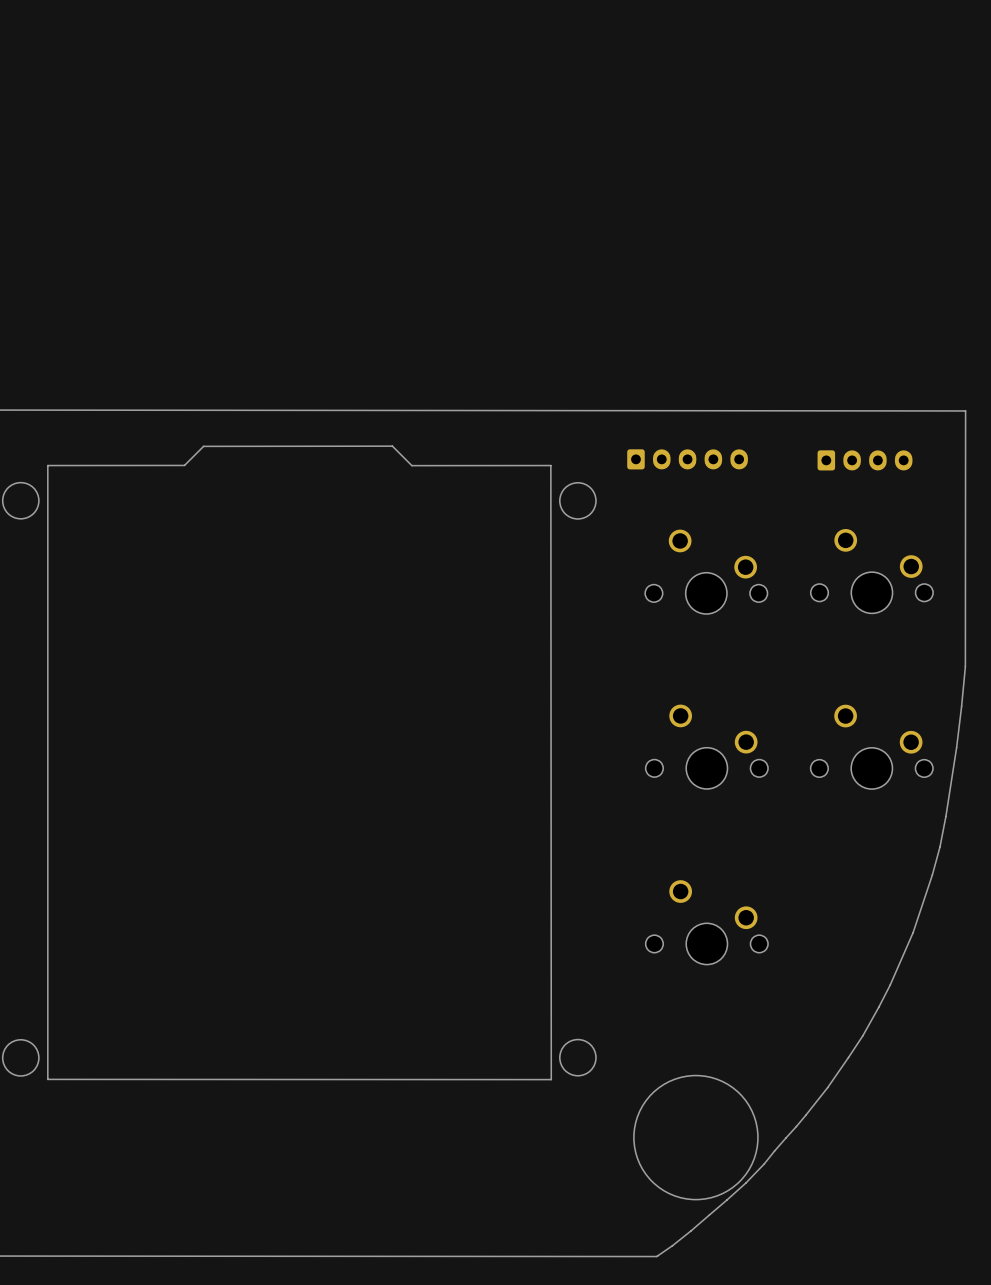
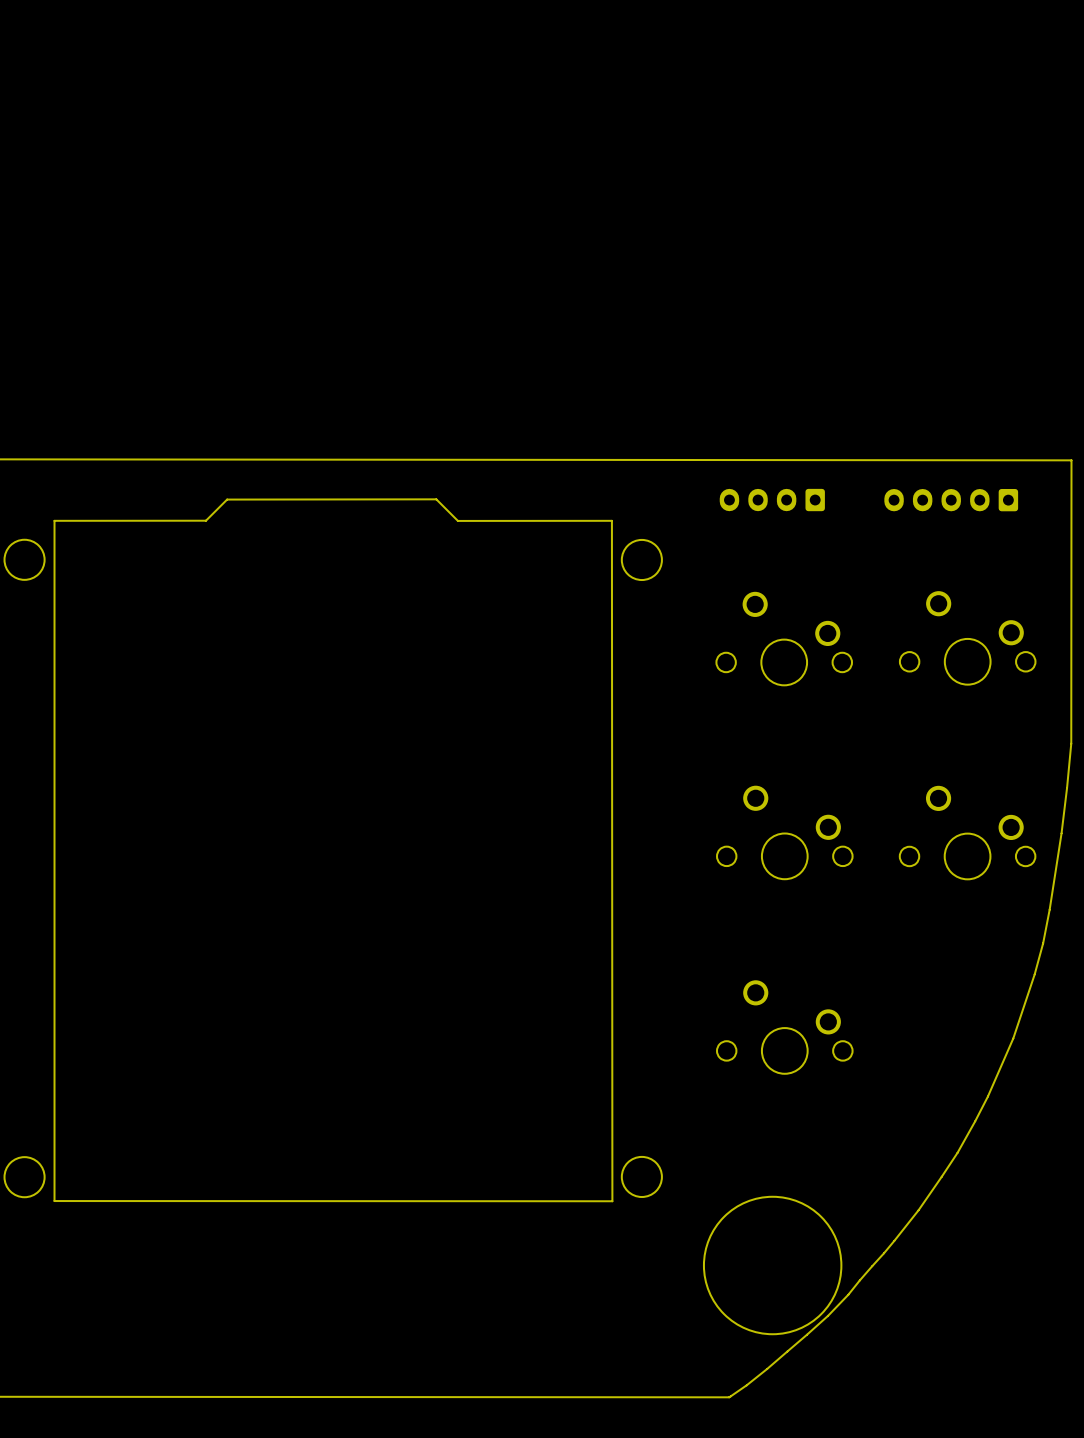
part rotation: 0° (687, 459) -> 180° (951, 500)
part position: (687, 459) -> (951, 500)
part rotation: 0° (865, 460) -> 180° (772, 500)
part position: (865, 460) -> (772, 500)

